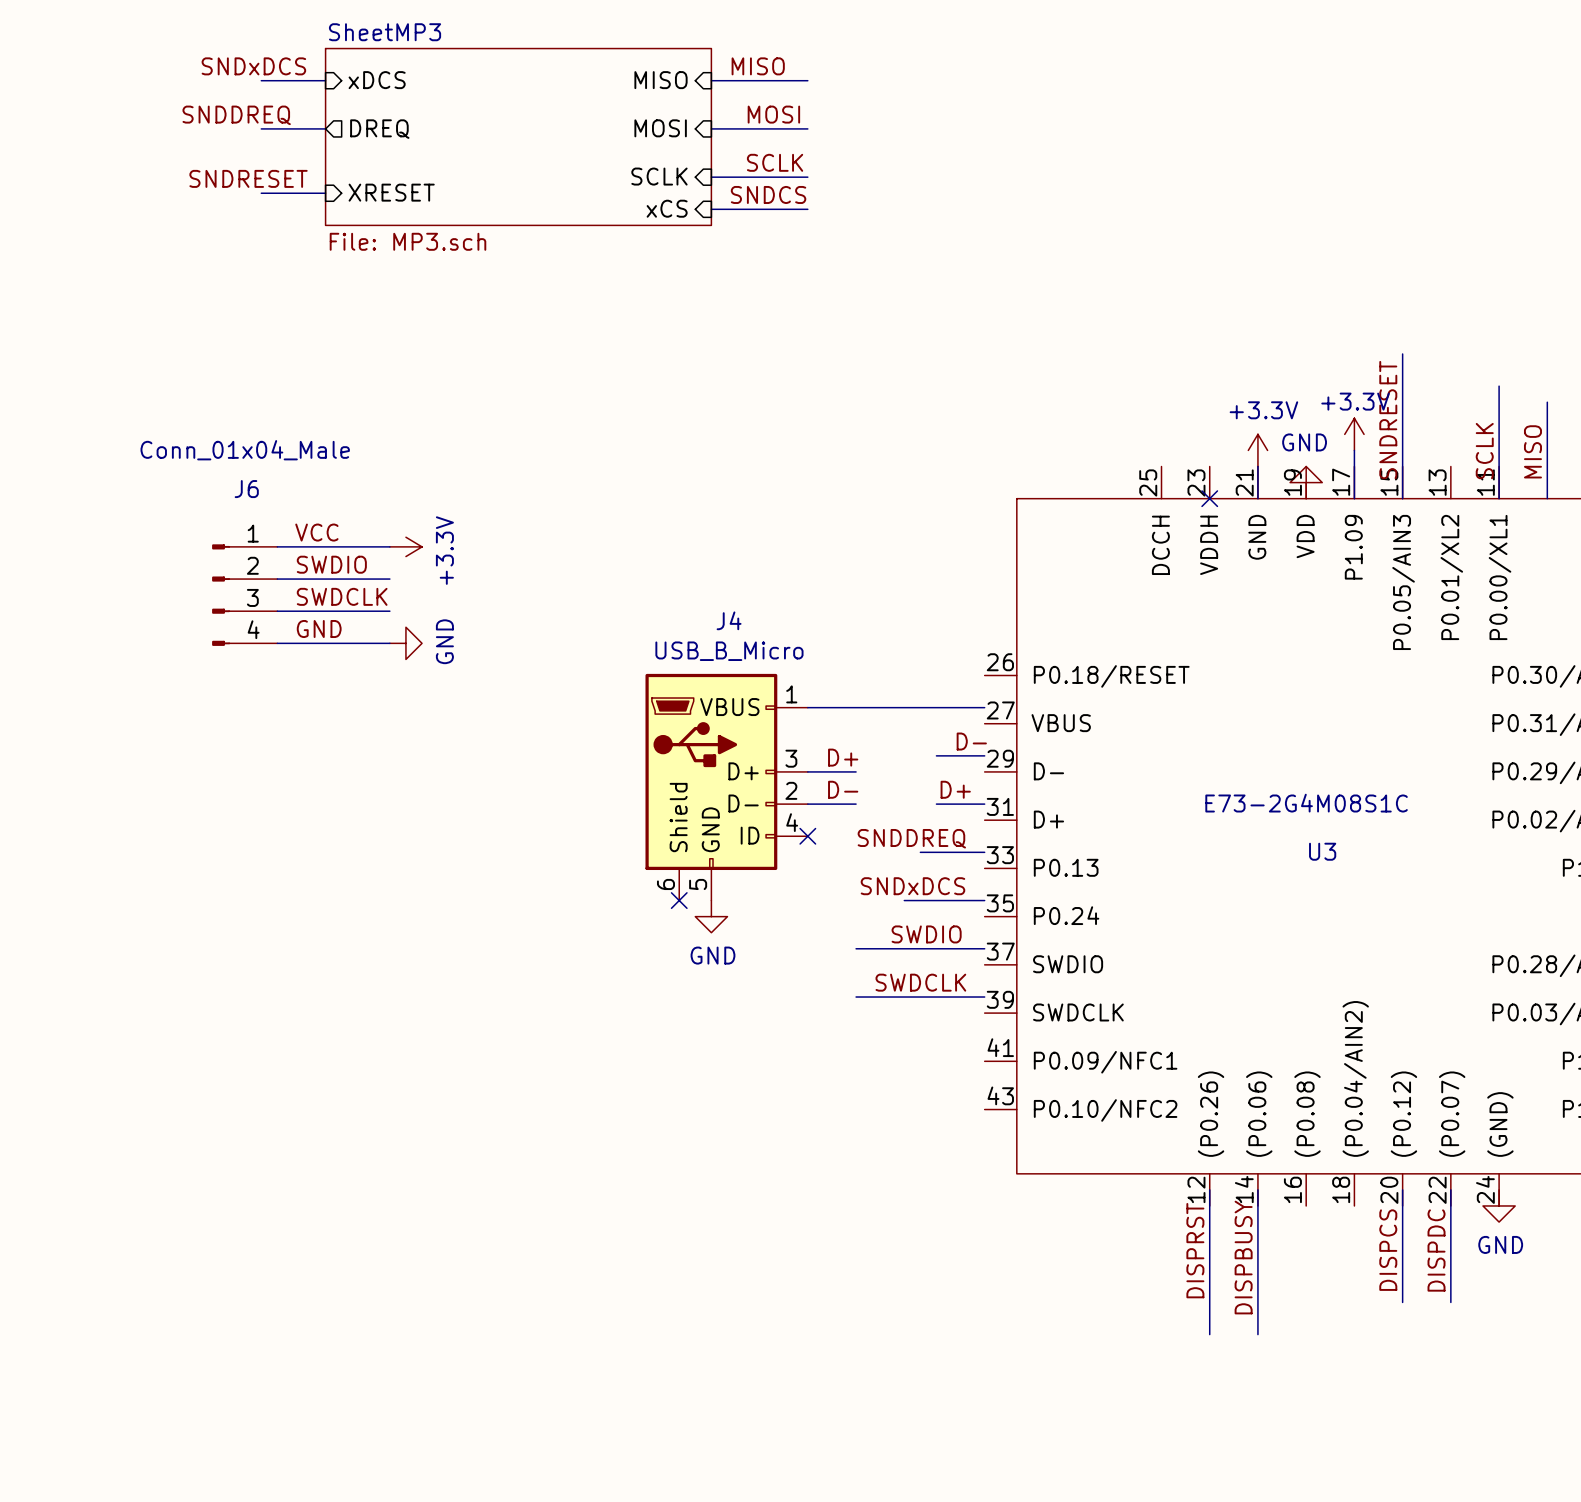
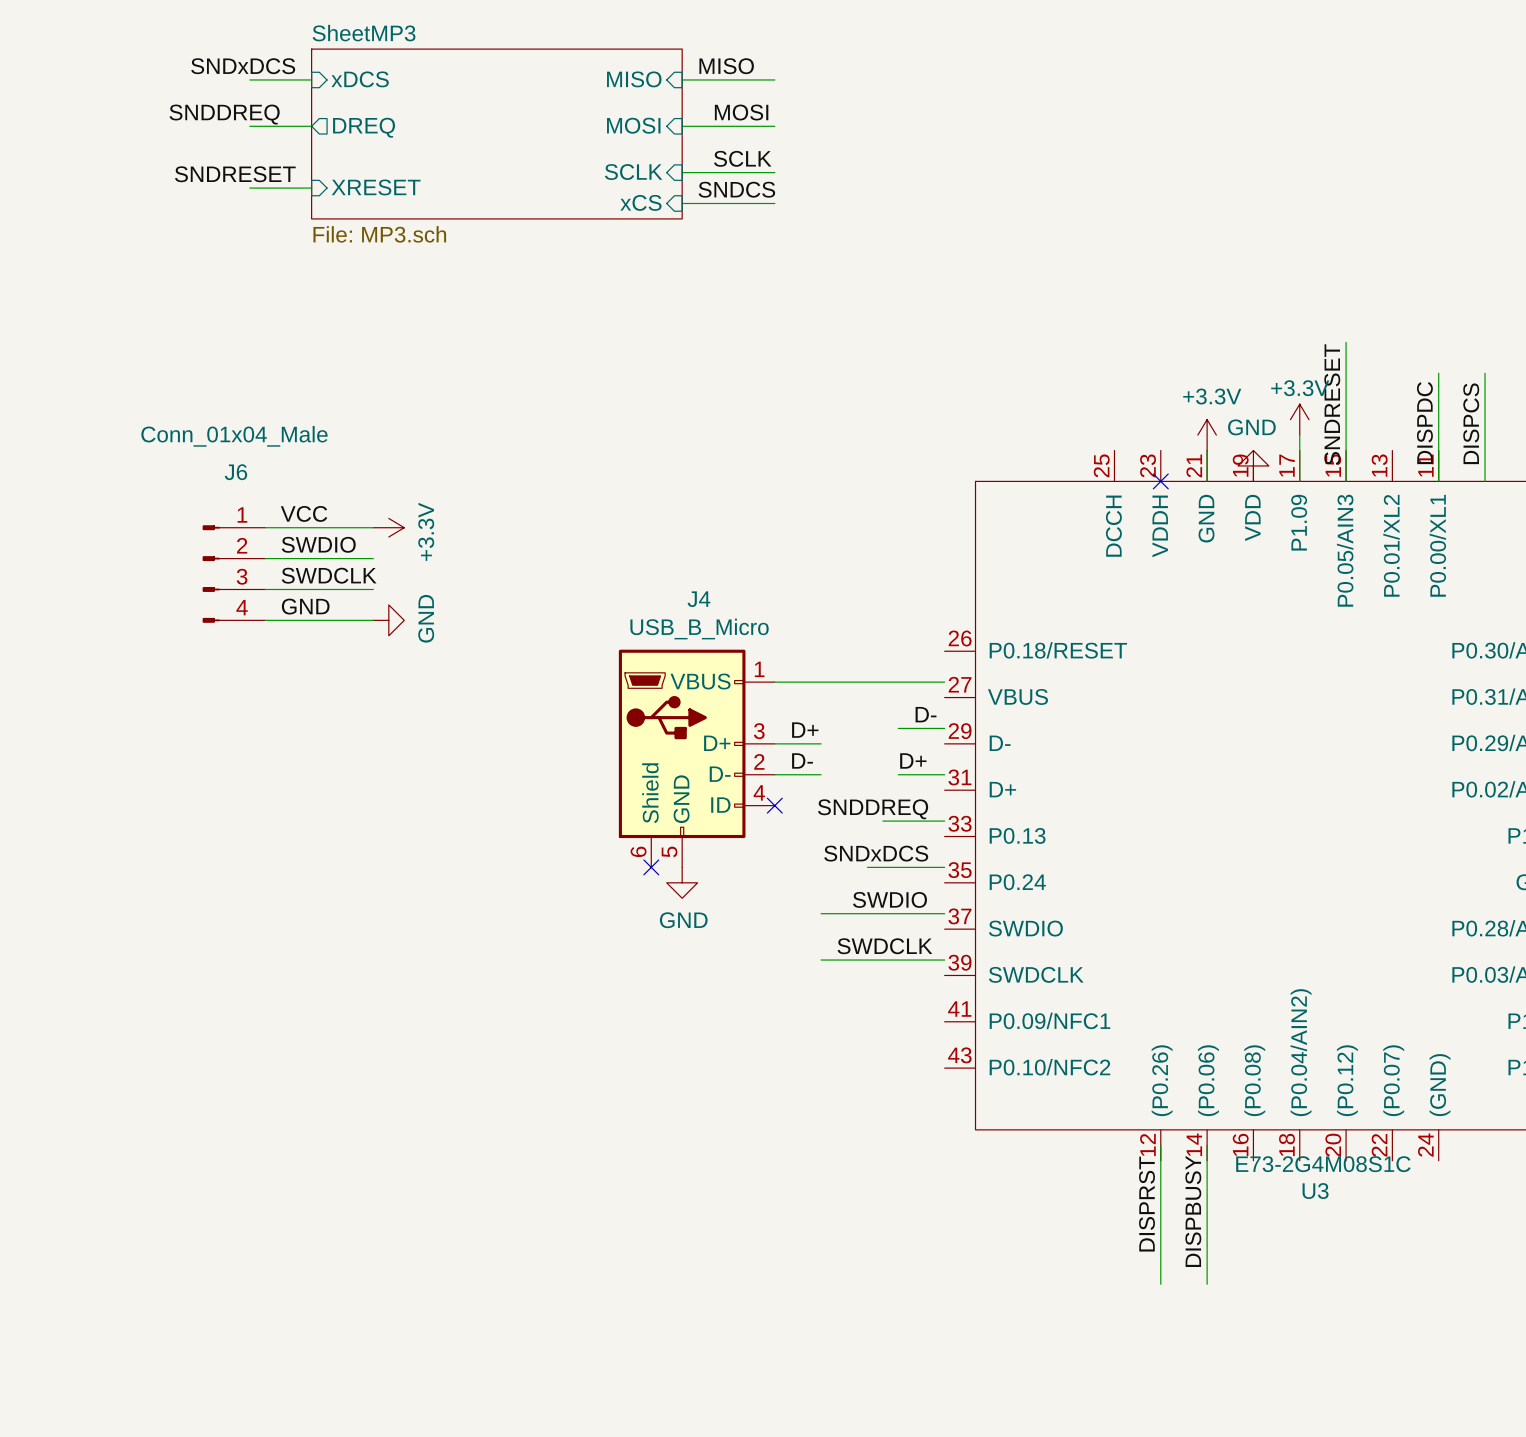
wire: none -> (1485, 373) (1485, 388)
label: SCLK (1484, 451) -> DISPDC (1424, 423)
label: MISO (1532, 451) -> DISPCS (1471, 423)
U3 value position: E73-2G4M08S1C (1306, 803) -> E73-2G4M08S1C (1323, 1164)
U3 name position: U3 (1322, 851) -> U3 (1315, 1191)
wire: (1402, 1189) (1402, 1302) -> none
wire: (1450, 1189) (1450, 1302) -> none
power symbol: GND (1499, 1205) -> none
label: DISPCS (1388, 1250) -> none
label: DISPDC (1436, 1250) -> none

